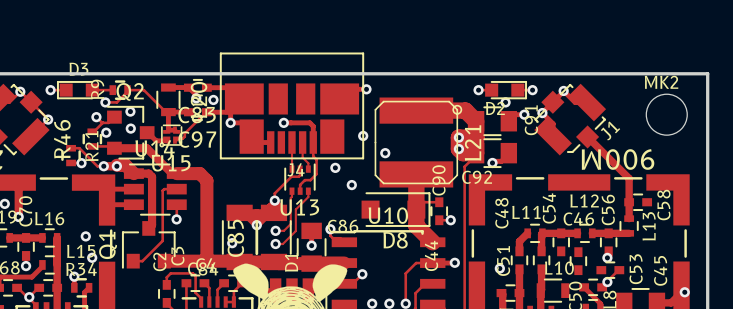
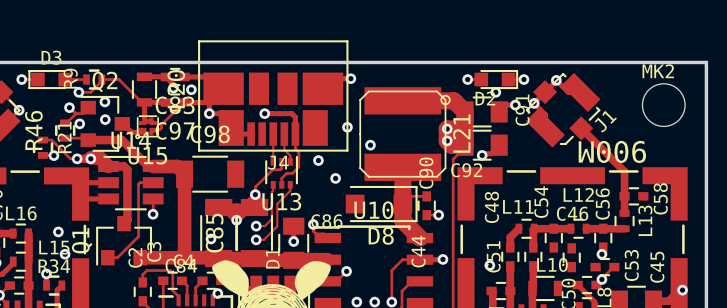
C98: none -> (210, 174)
track: (242, 283) (233, 291) (233, 302) (225, 302) -> none
via: none -> (217, 293)

